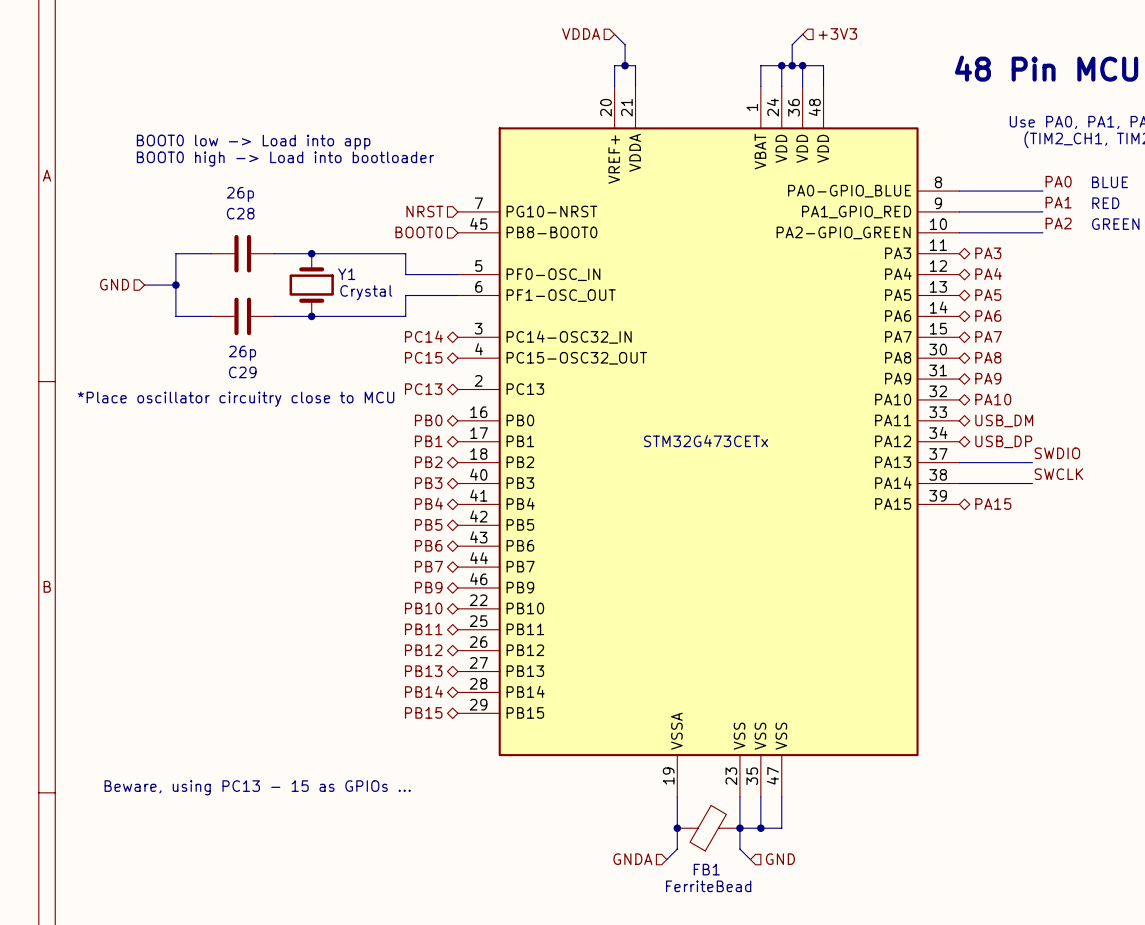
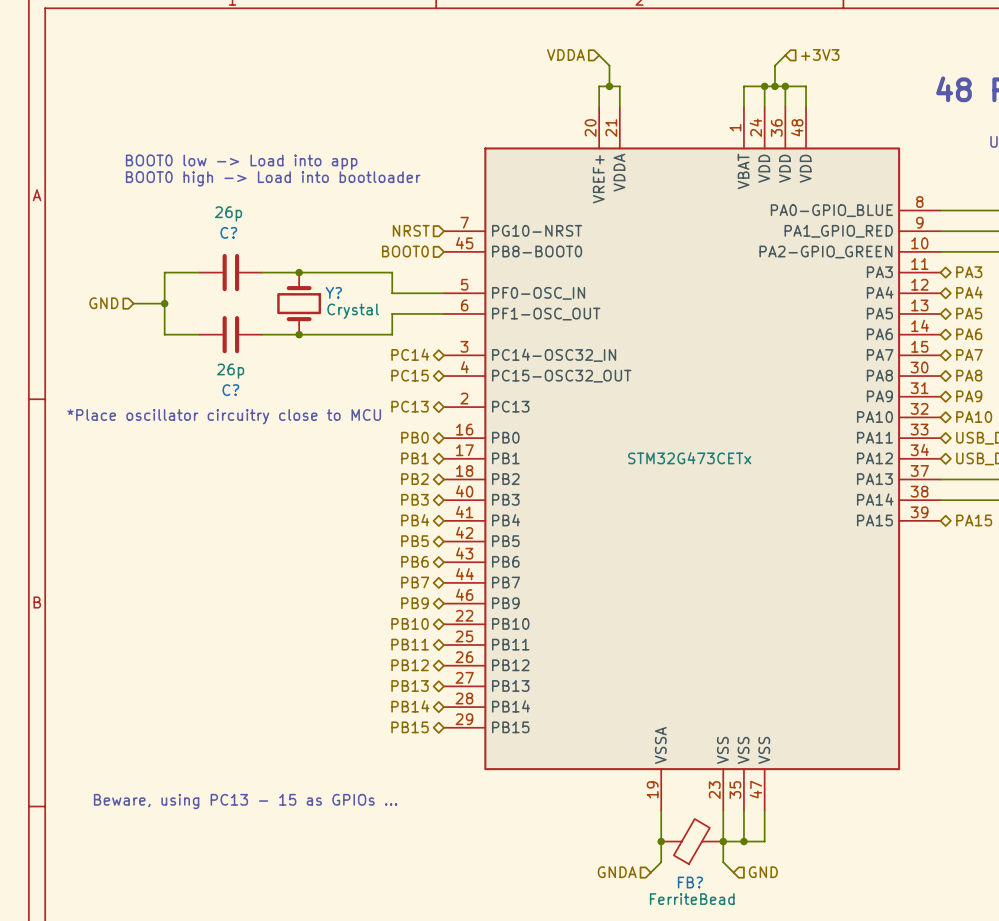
C28 name: C28 (240, 213) -> C? (228, 232)
Y1 name: Y1 (346, 274) -> Y? (333, 292)
C29 name: C29 (242, 372) -> C? (230, 390)
FB1 name: FB1 (706, 869) -> FB? (690, 882)

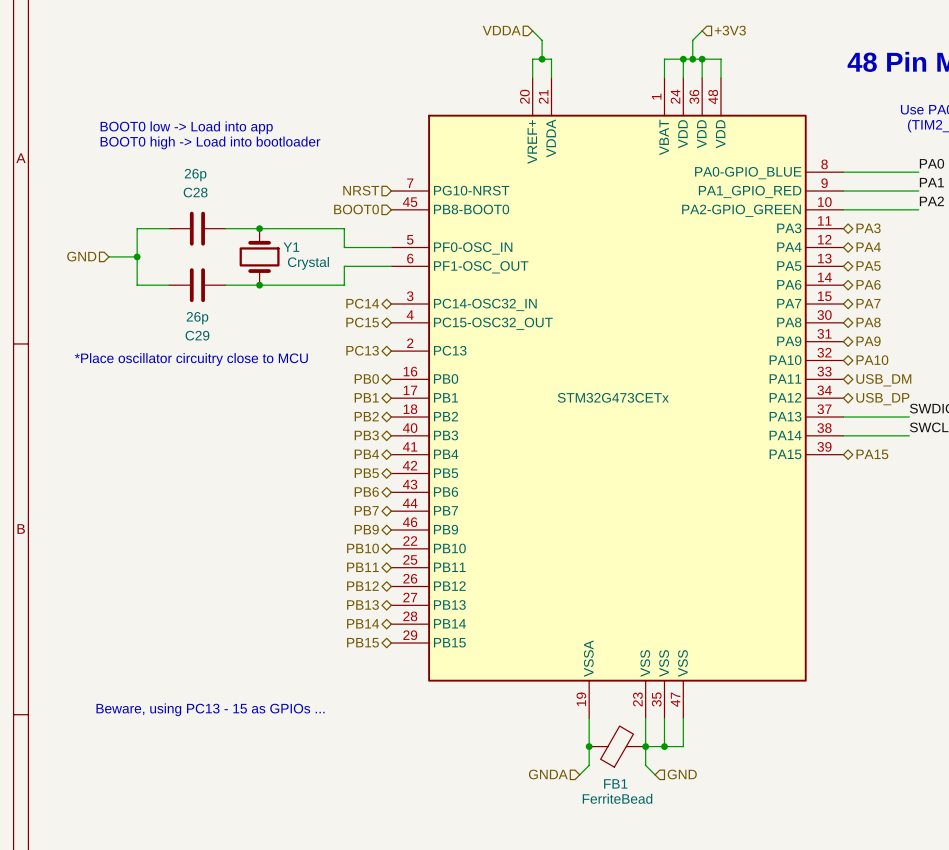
C? name: C? (228, 232) -> C28 (195, 192)
Y? name: Y? (333, 292) -> Y1 (291, 247)
C? name: C? (230, 390) -> C29 (197, 335)
FB? name: FB? (690, 882) -> FB1 (615, 783)

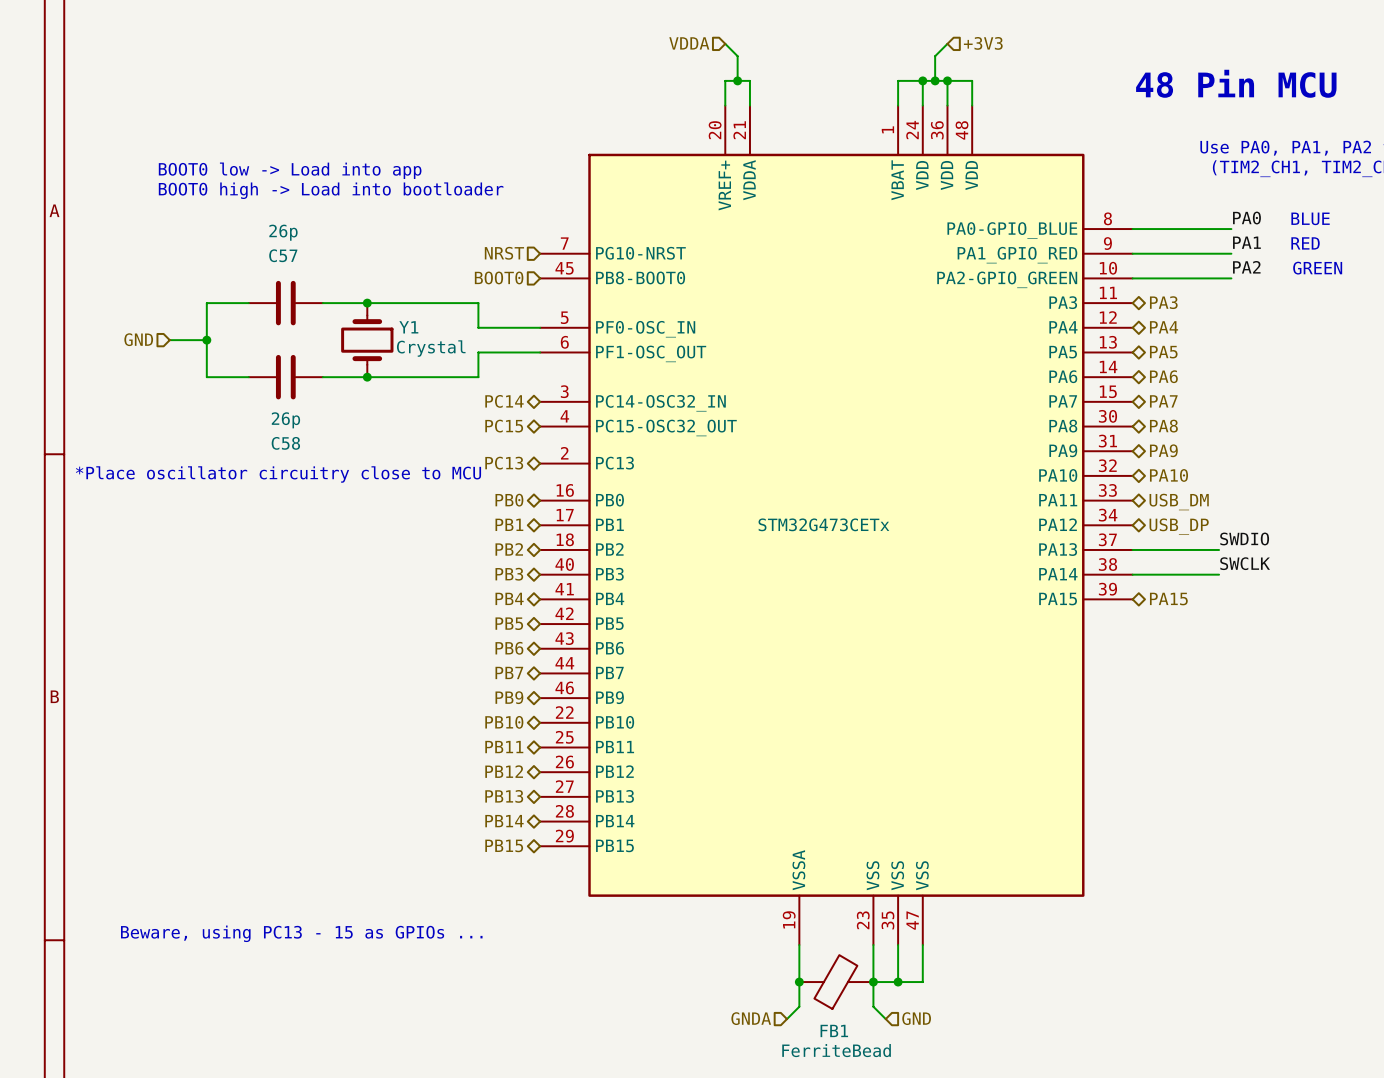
C28 name: C28 (195, 192) -> C57 (283, 255)
C29 name: C29 (197, 335) -> C58 (285, 443)

